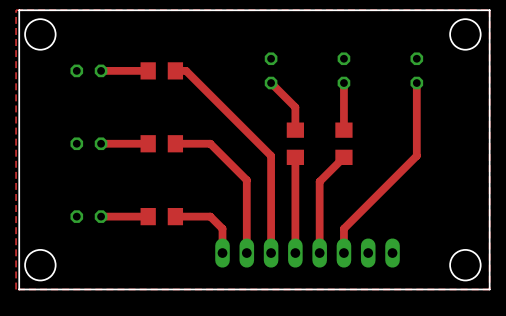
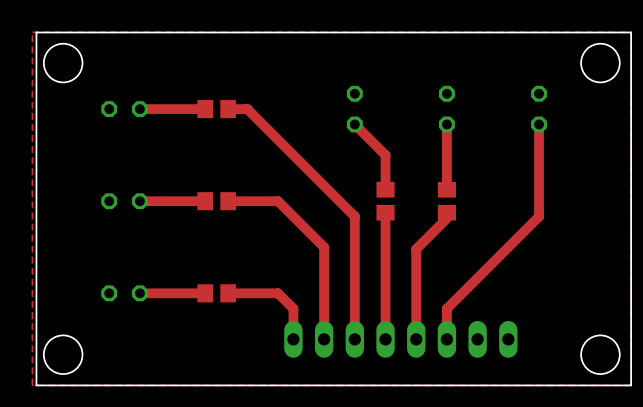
part footprint: [140, 62, 184, 80] -> [197, 100, 237, 119]
part footprint: [286, 122, 304, 165] -> [376, 181, 395, 221]
part footprint: [335, 122, 353, 165] -> [437, 181, 456, 221]
part footprint: [140, 135, 184, 153] -> [197, 192, 237, 211]
part footprint: [140, 207, 184, 226] -> [197, 284, 237, 303]

